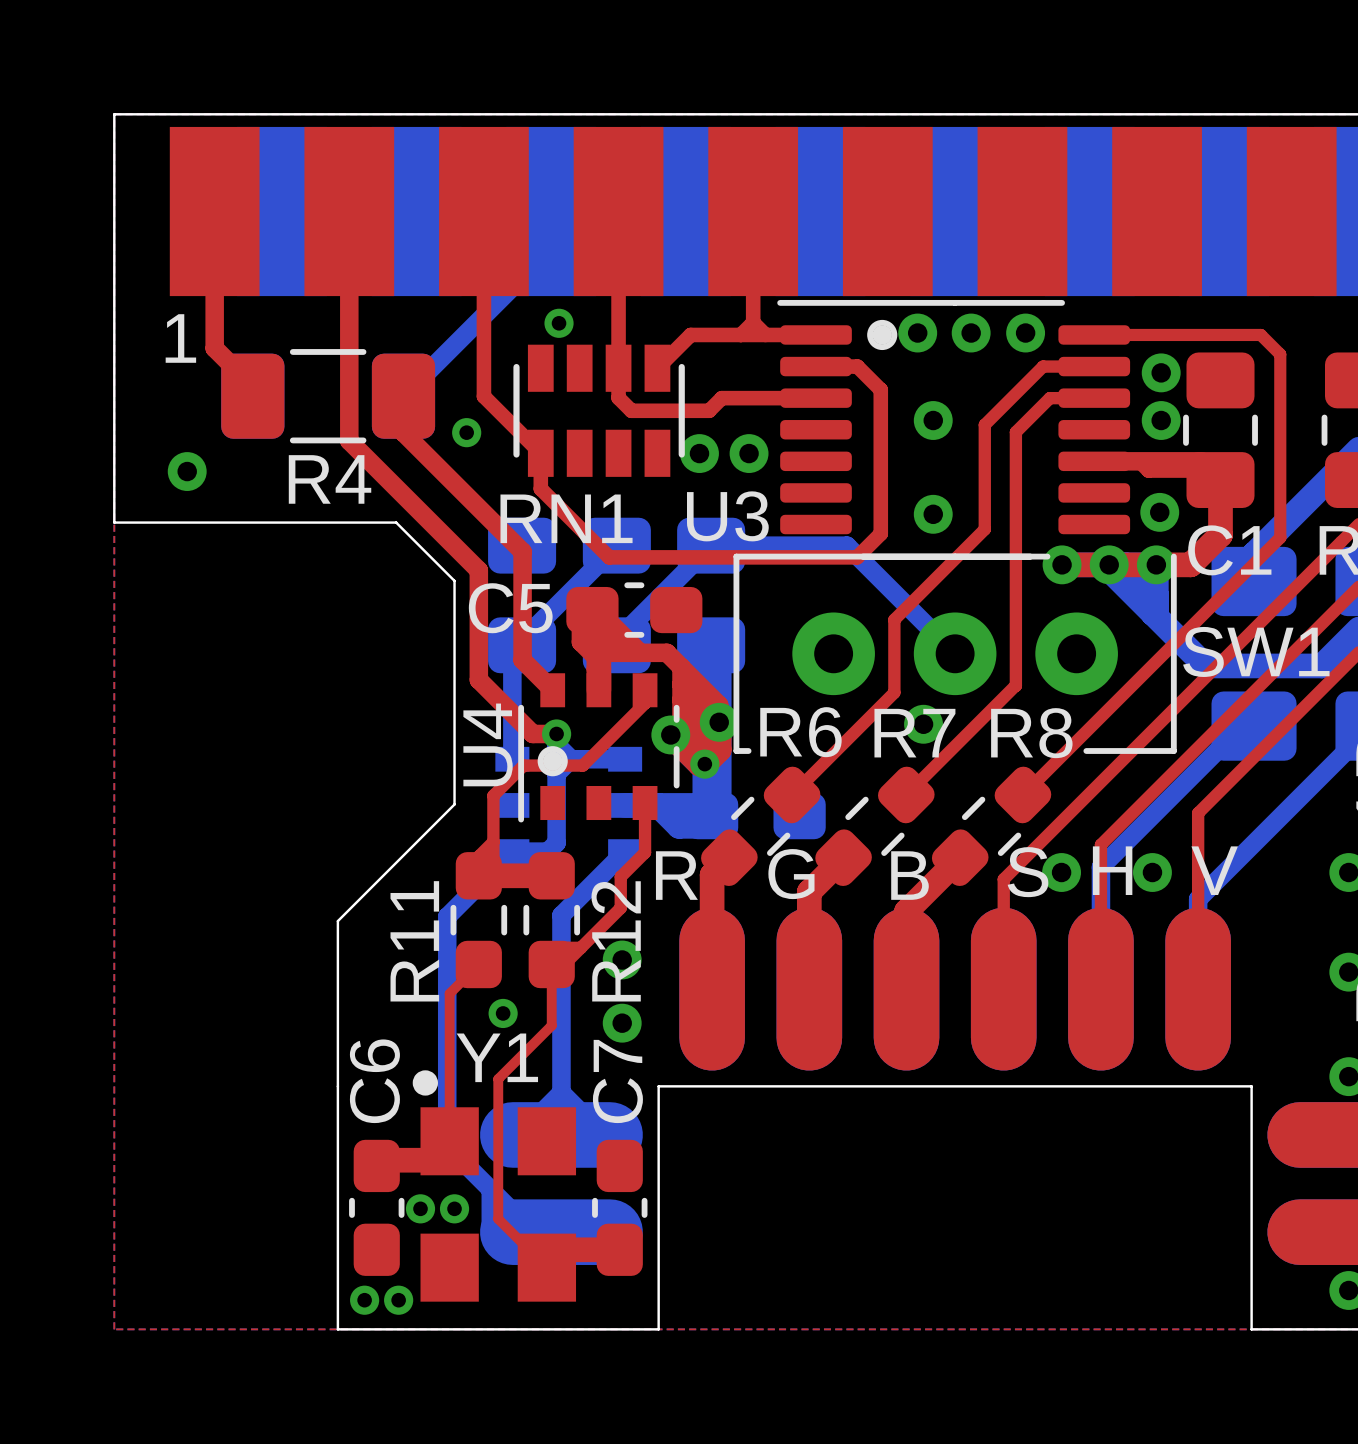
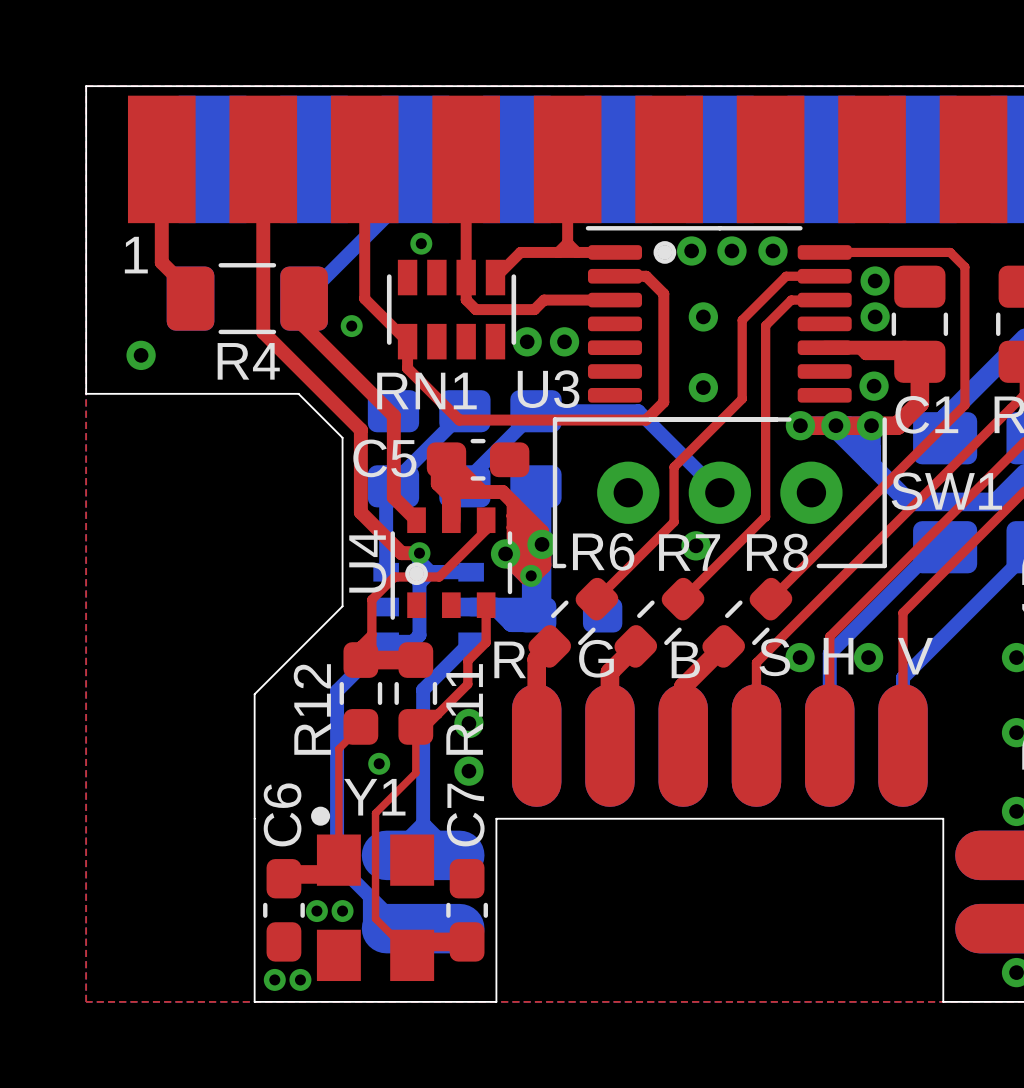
R11 name: R11 (414, 941) -> R12 (312, 709)
R12 name: R12 (616, 941) -> R11 (464, 709)

